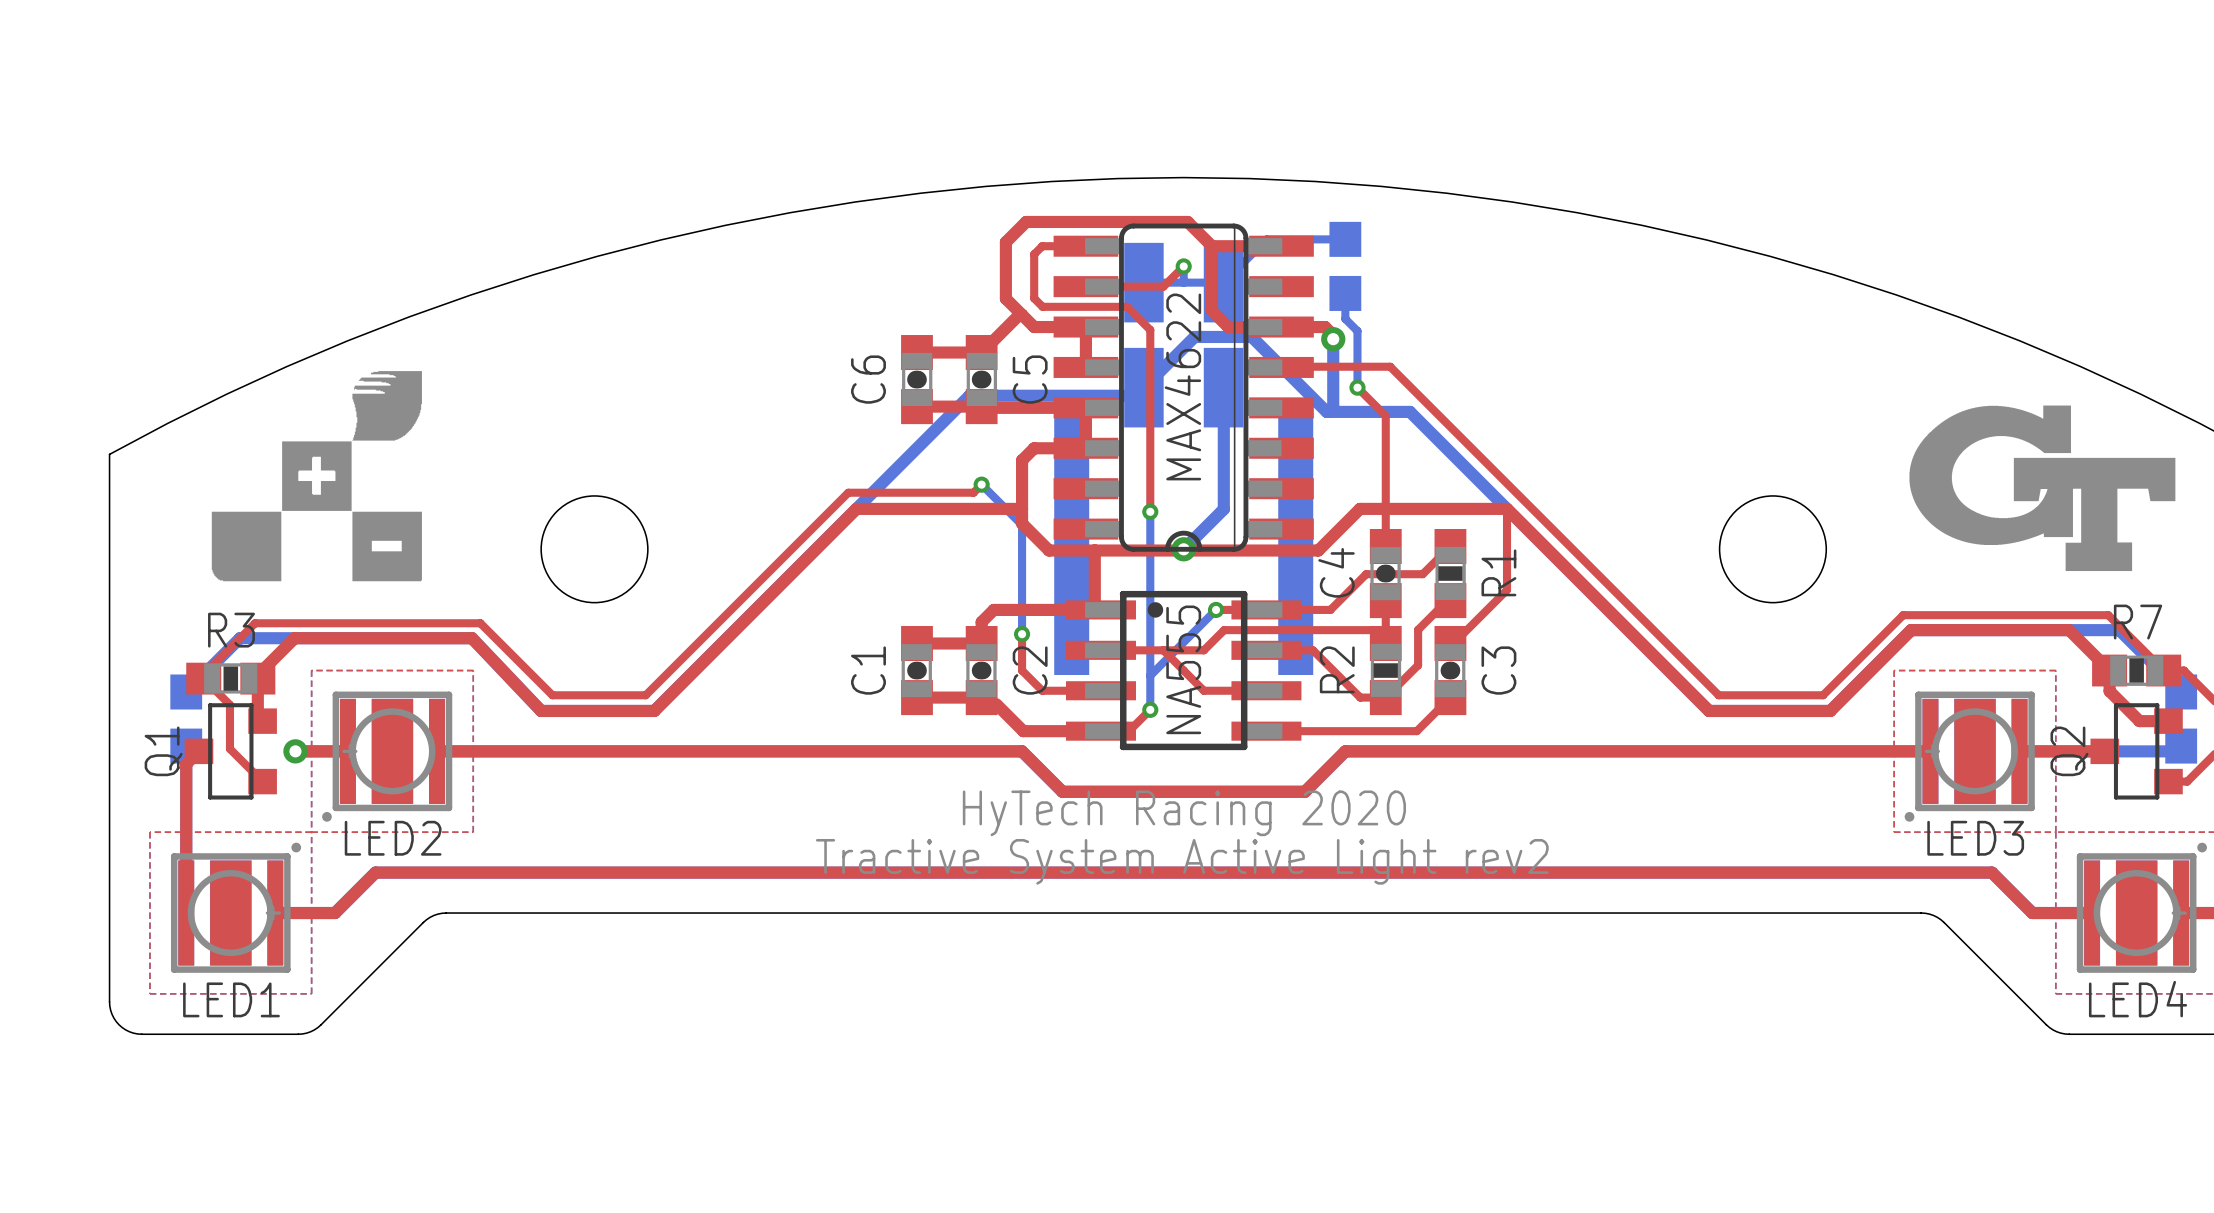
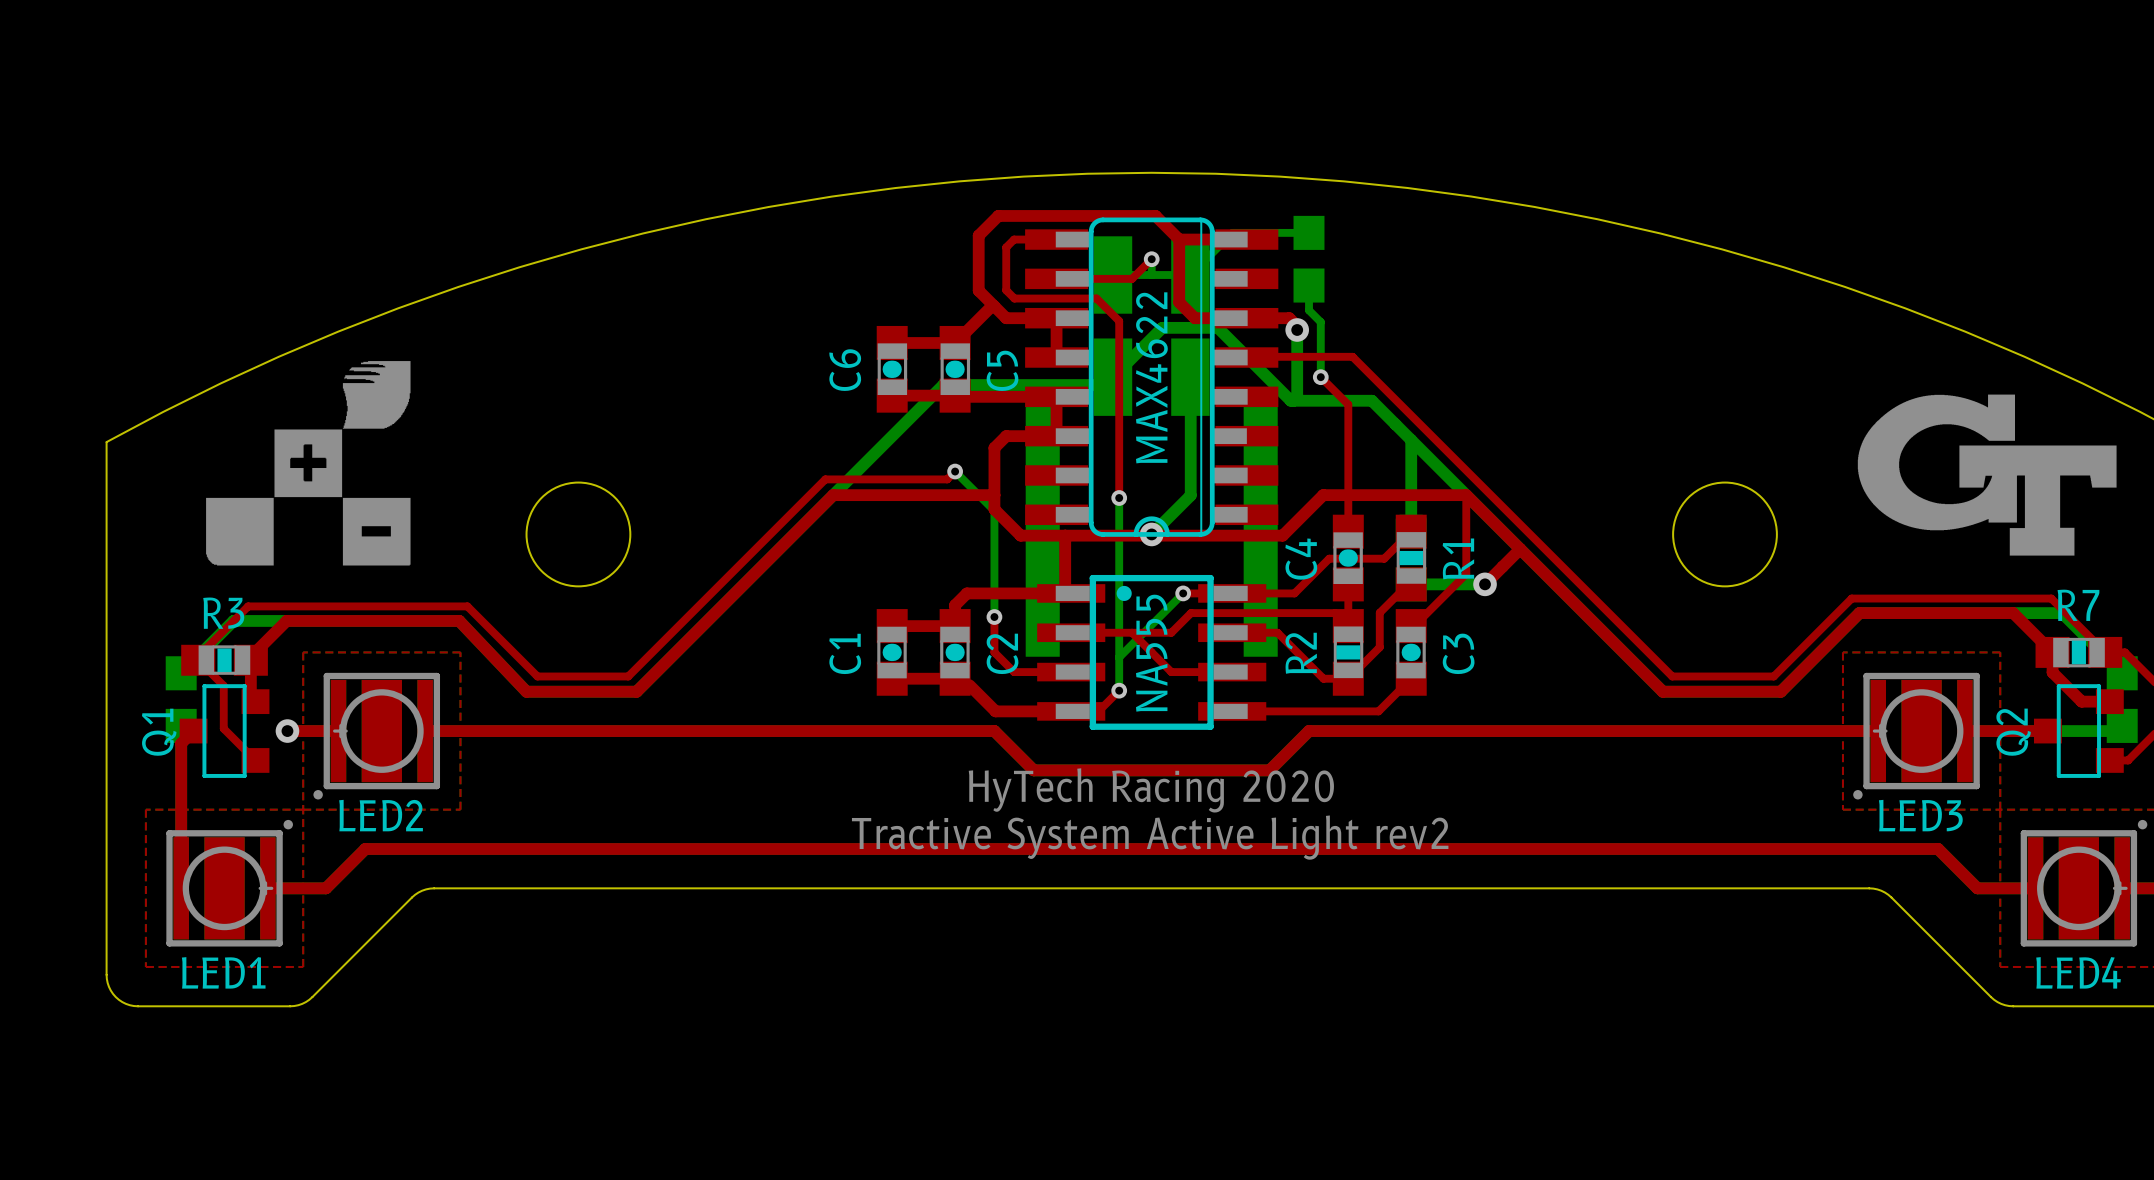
bottom track: none -> (1411, 440) (1411, 531)
top track: none -> (1520, 549) (1485, 584)
bottom track: none -> (1411, 584) (1485, 584)
via: none -> (1485, 584)

